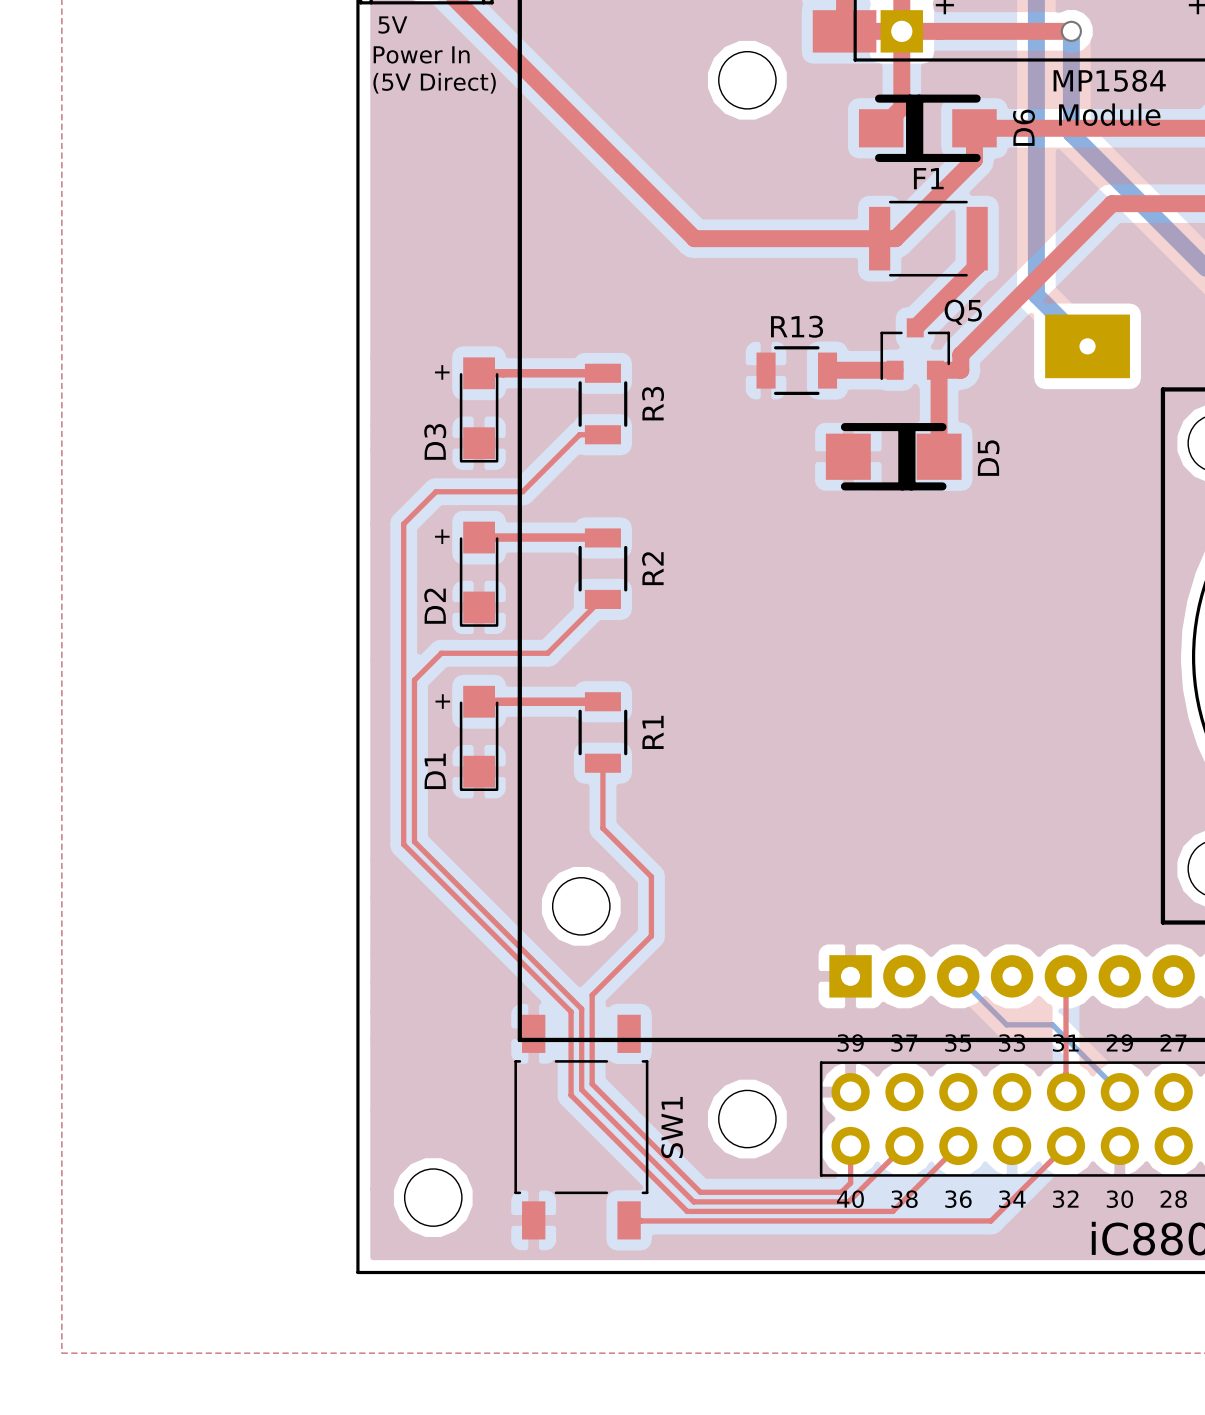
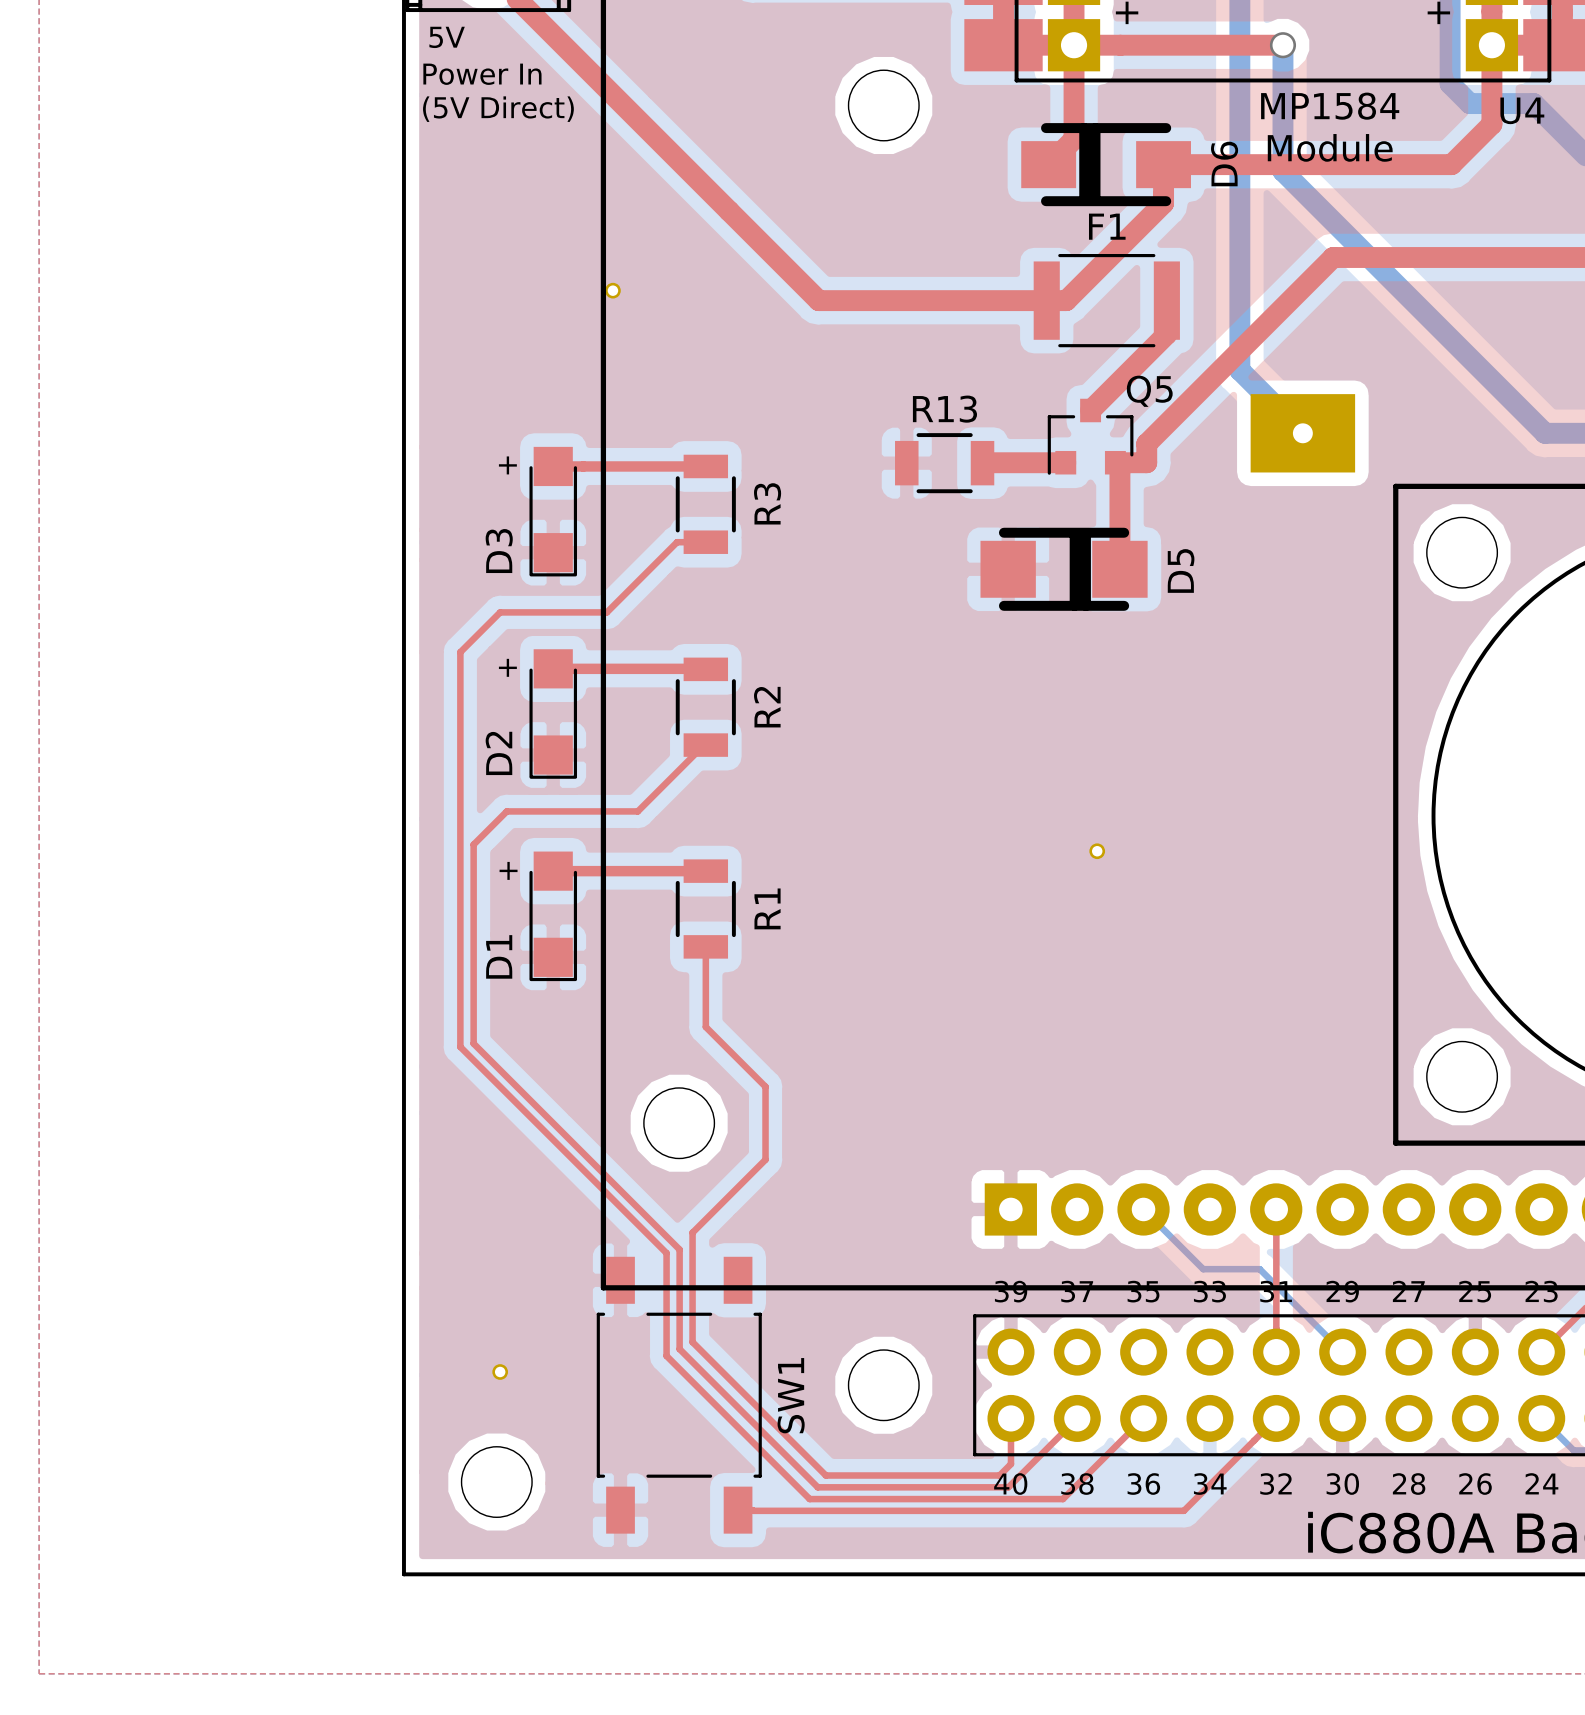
part: none -> (612, 290)
part: none -> (1097, 851)
part: none -> (500, 1372)

